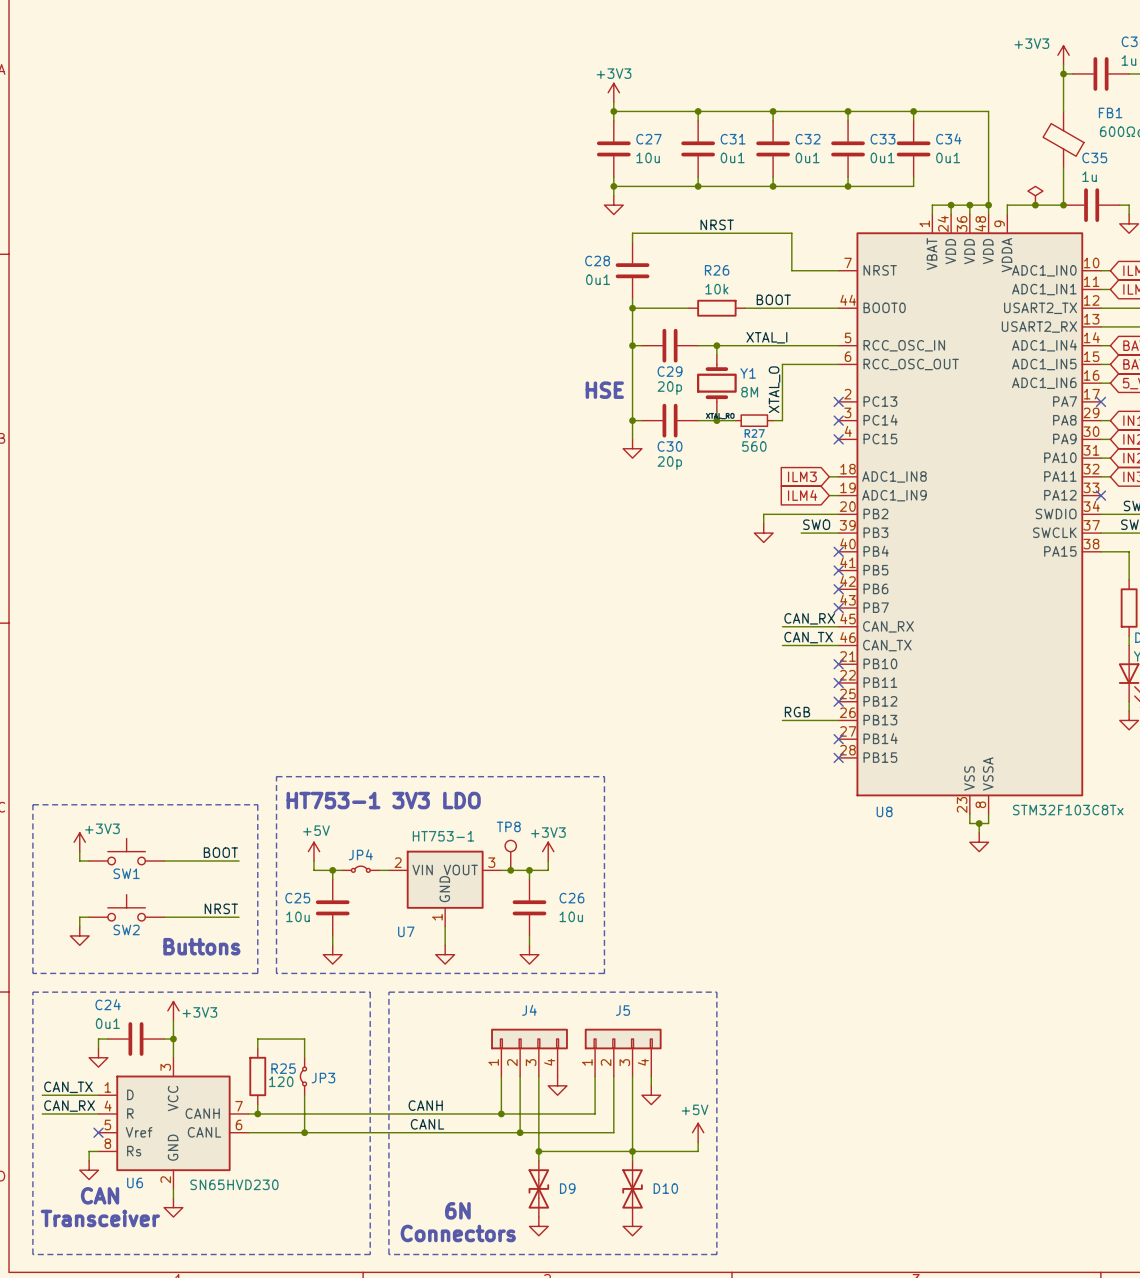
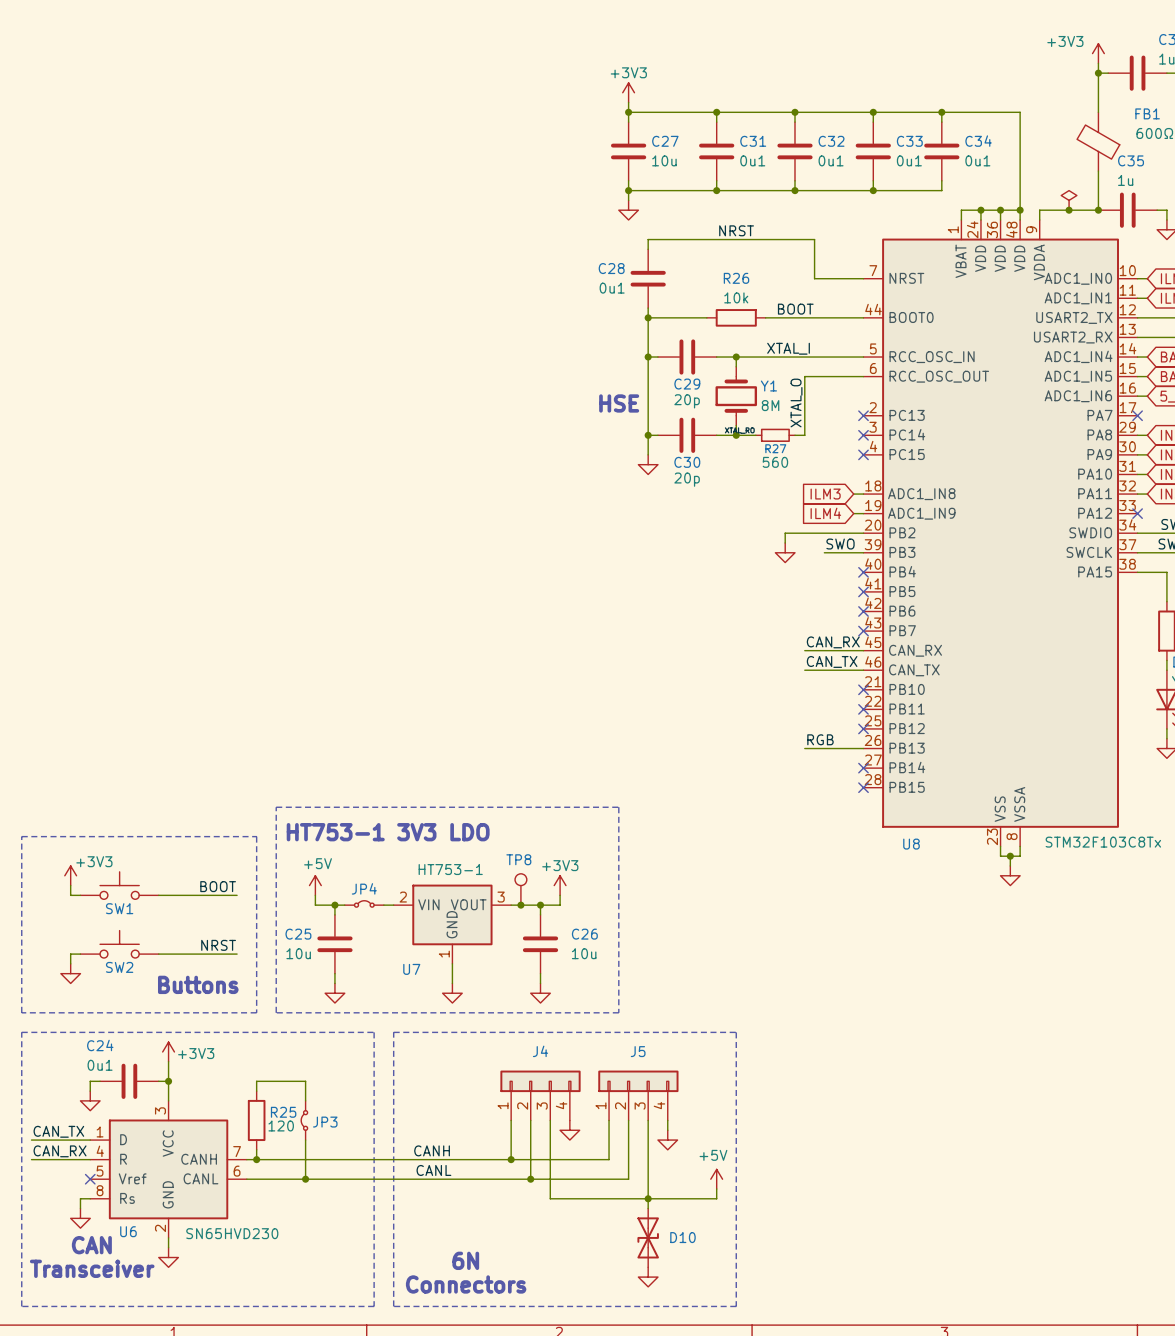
wire: (538, 1151) (538, 1160) -> none
junction: (538, 1151) -> none
D9: (538, 1188) -> none
power symbol: (538, 1226) -> none

